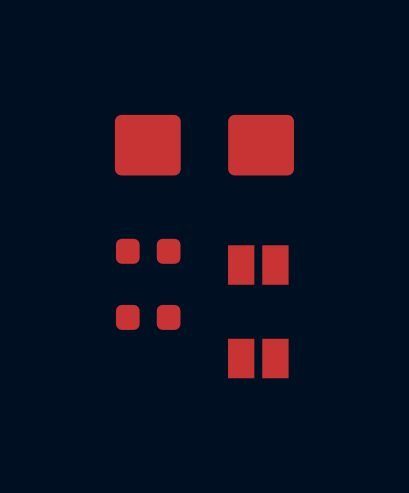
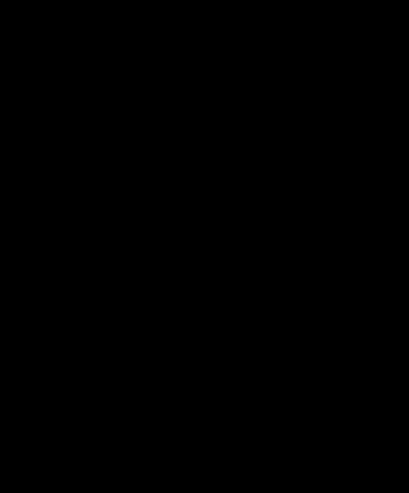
part: (204, 145) -> none
part: (148, 251) -> none
part: (258, 265) -> none
part: (148, 317) -> none
part: (258, 358) -> none

